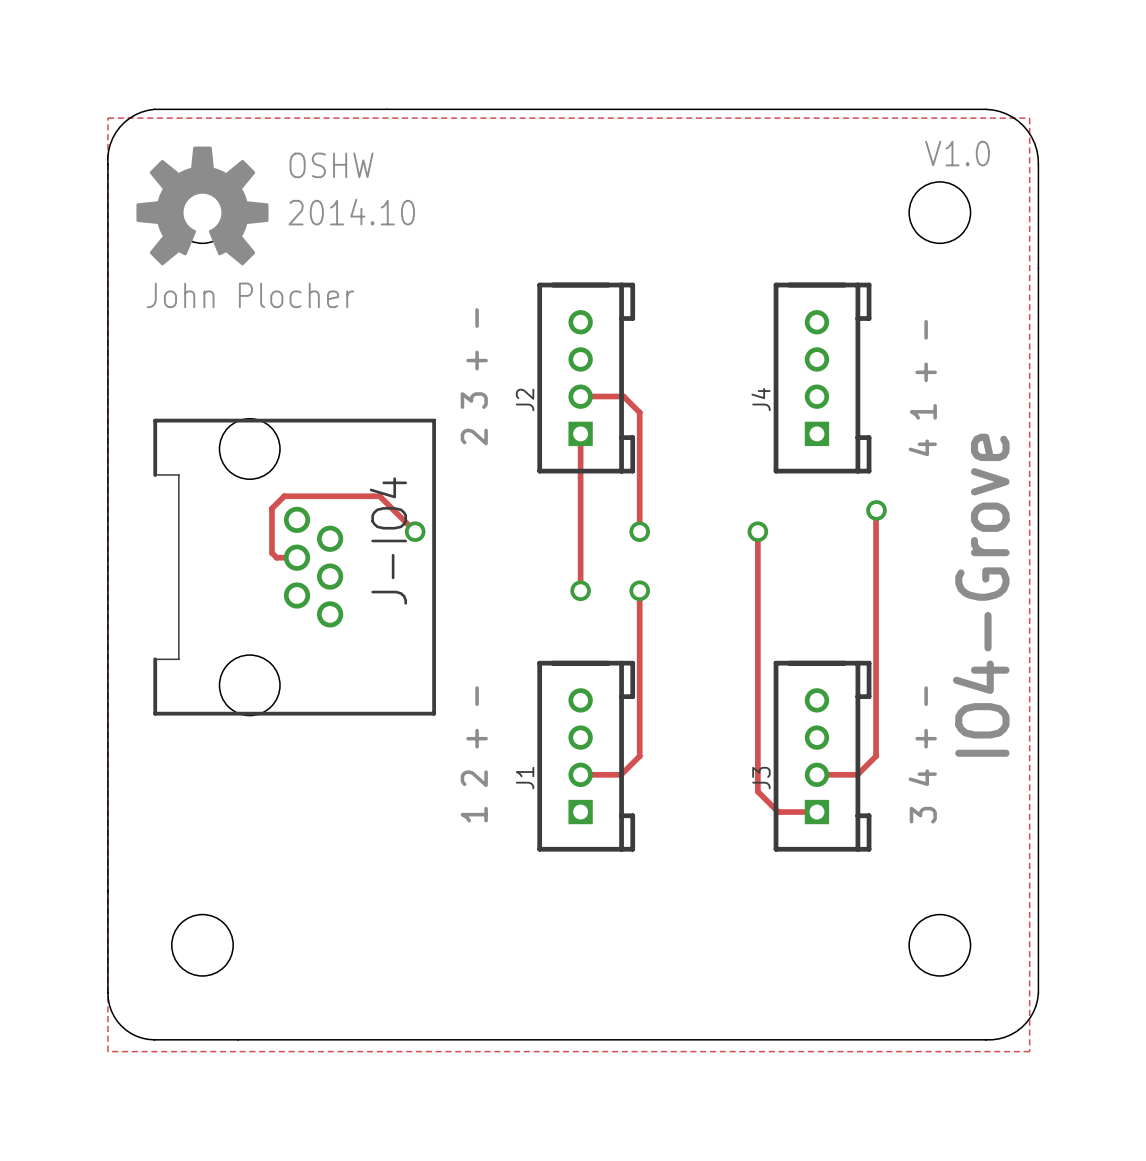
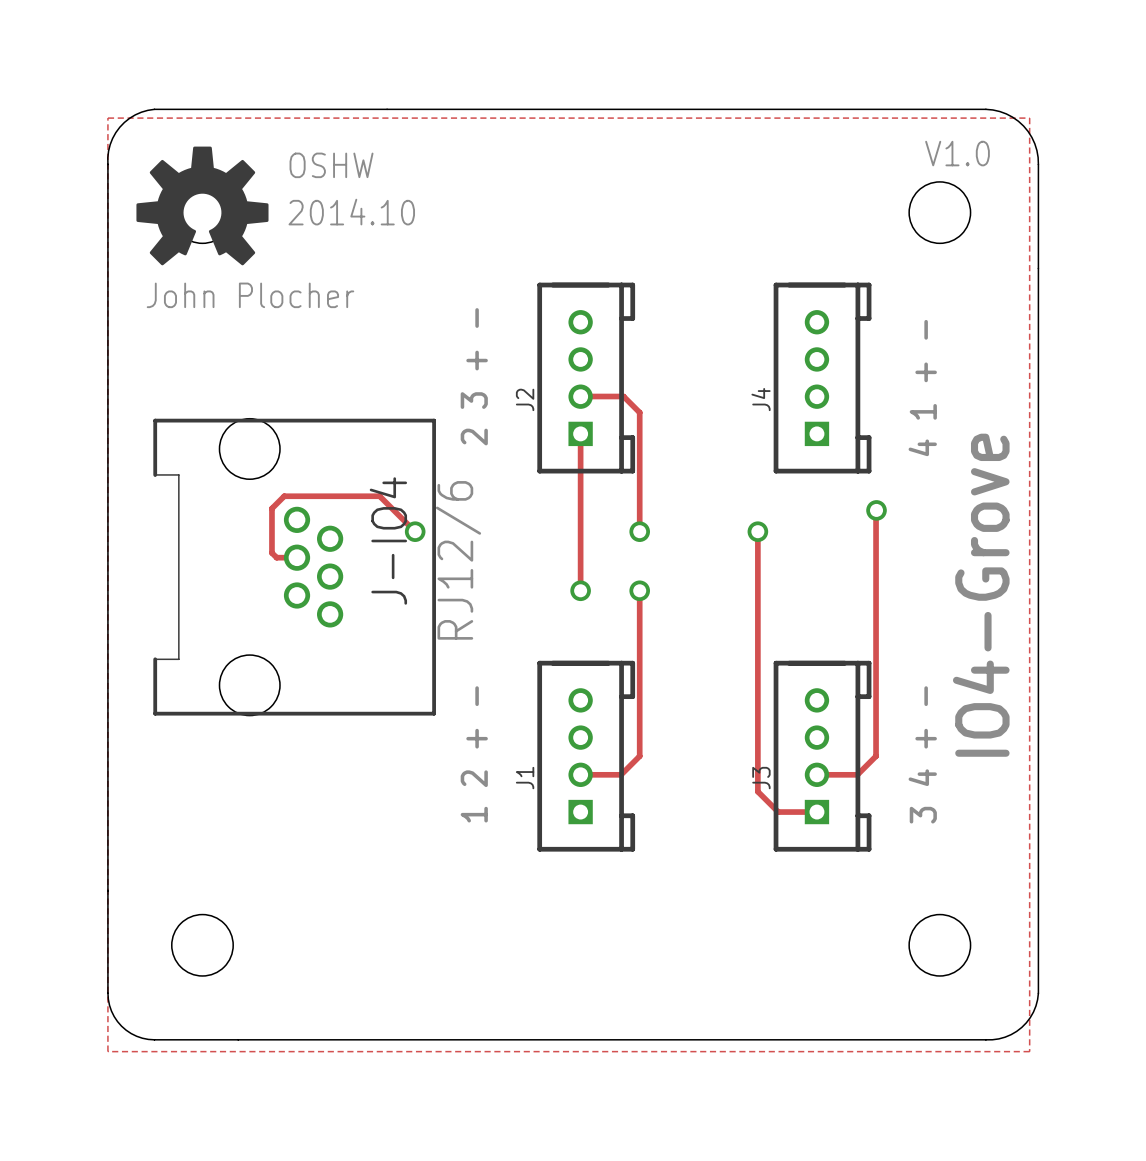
drawing shape: [136, 146, 269, 266] -> [136, 146, 269, 266]
J-IO4 value: none -> RJ12/6 (458, 560)

